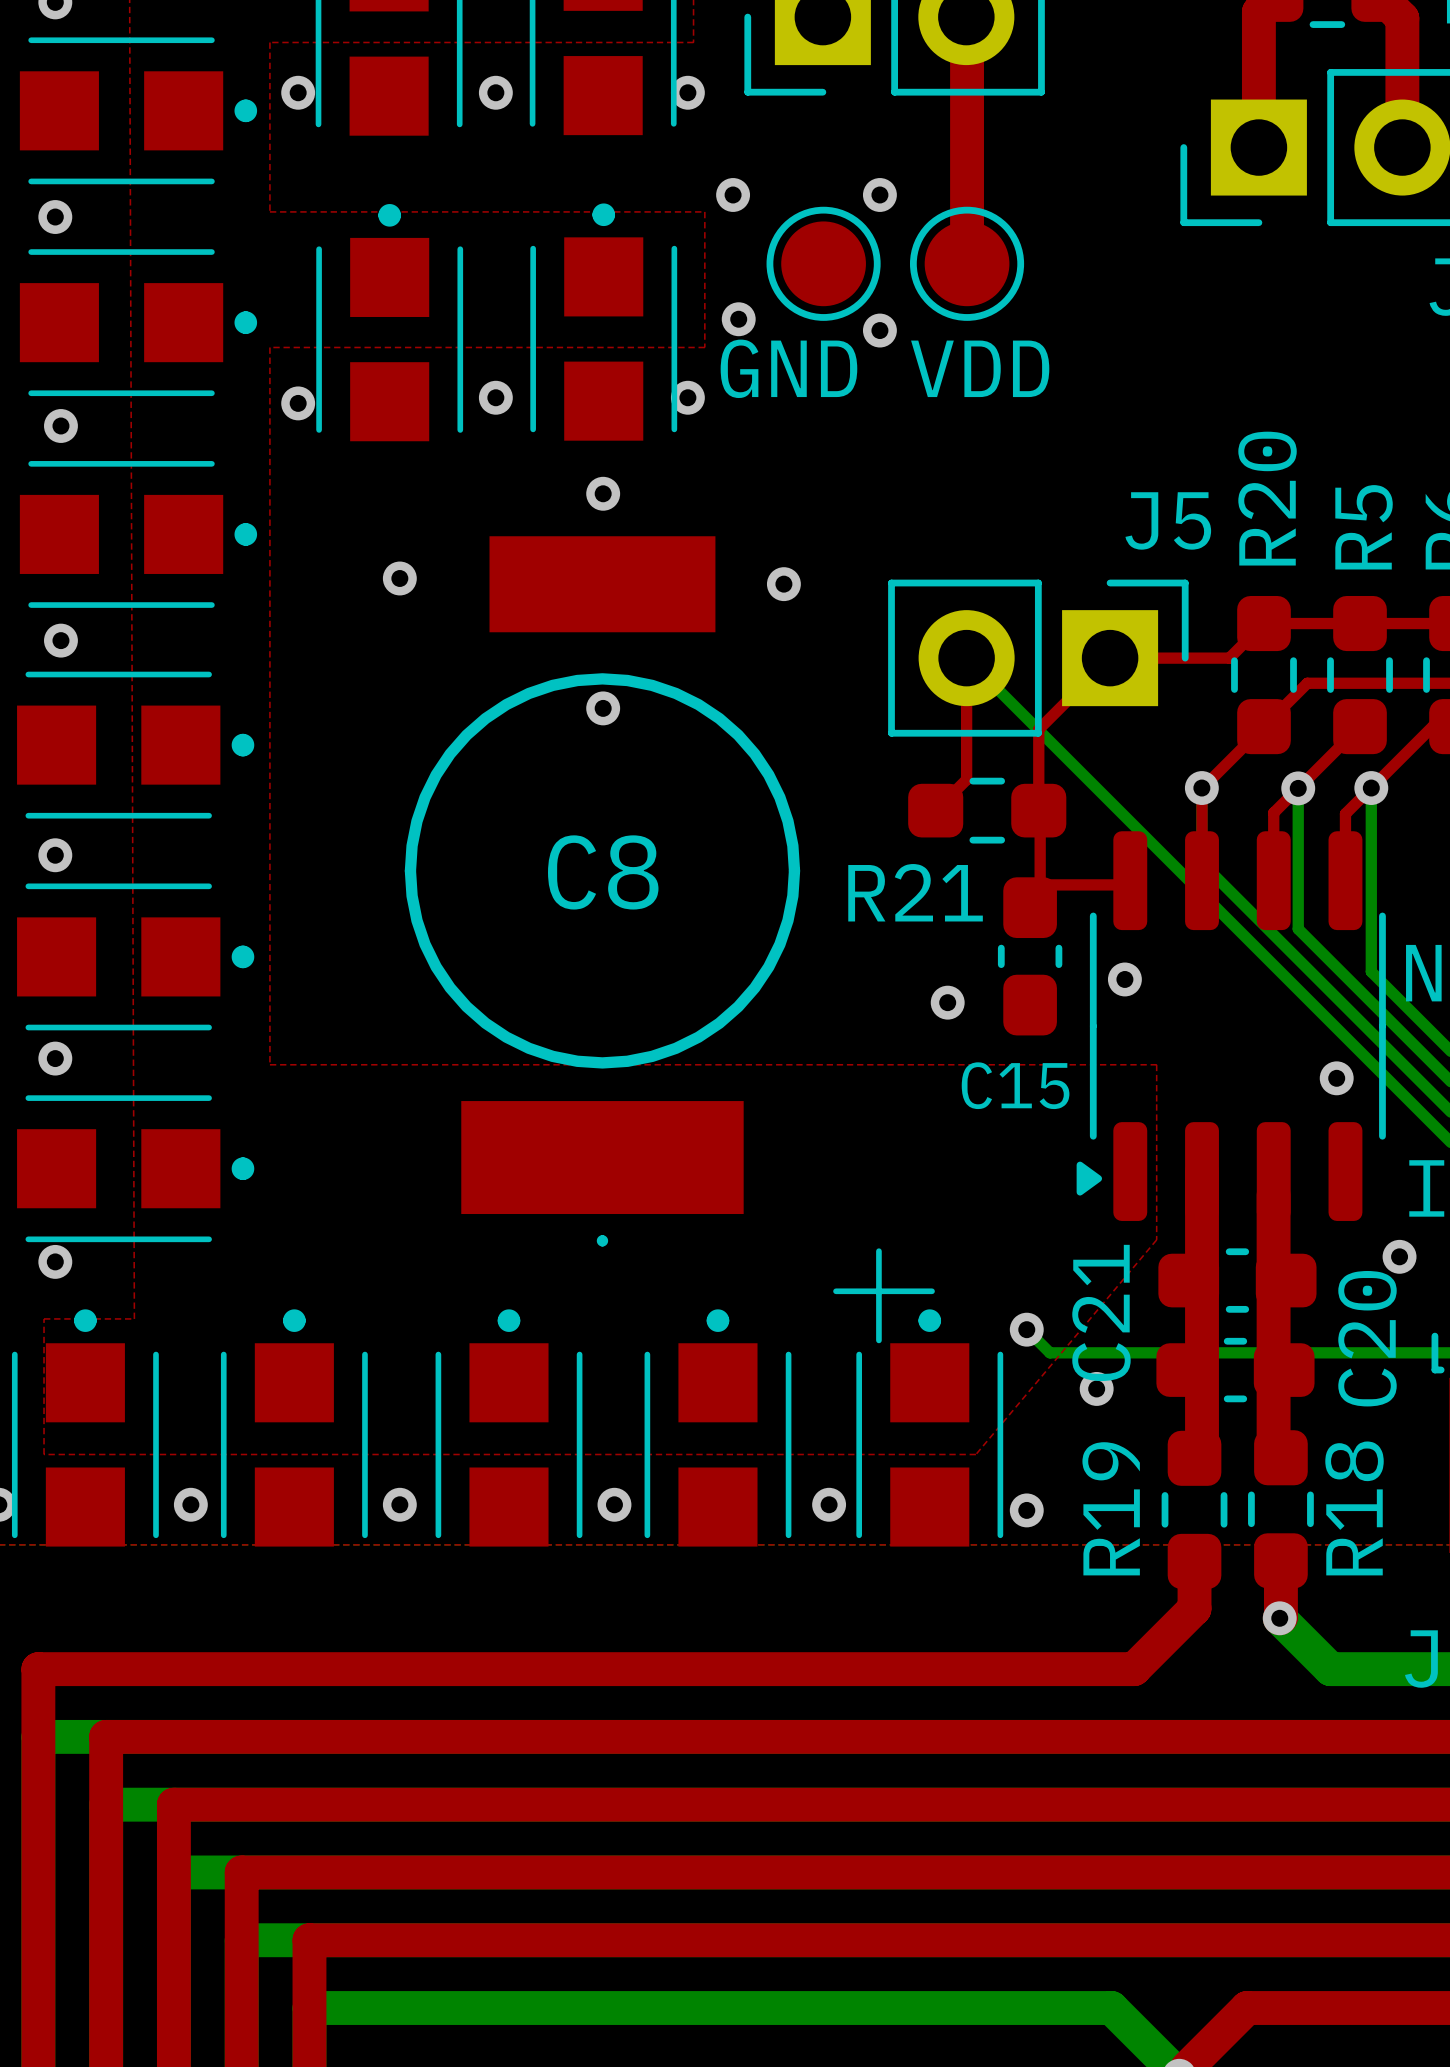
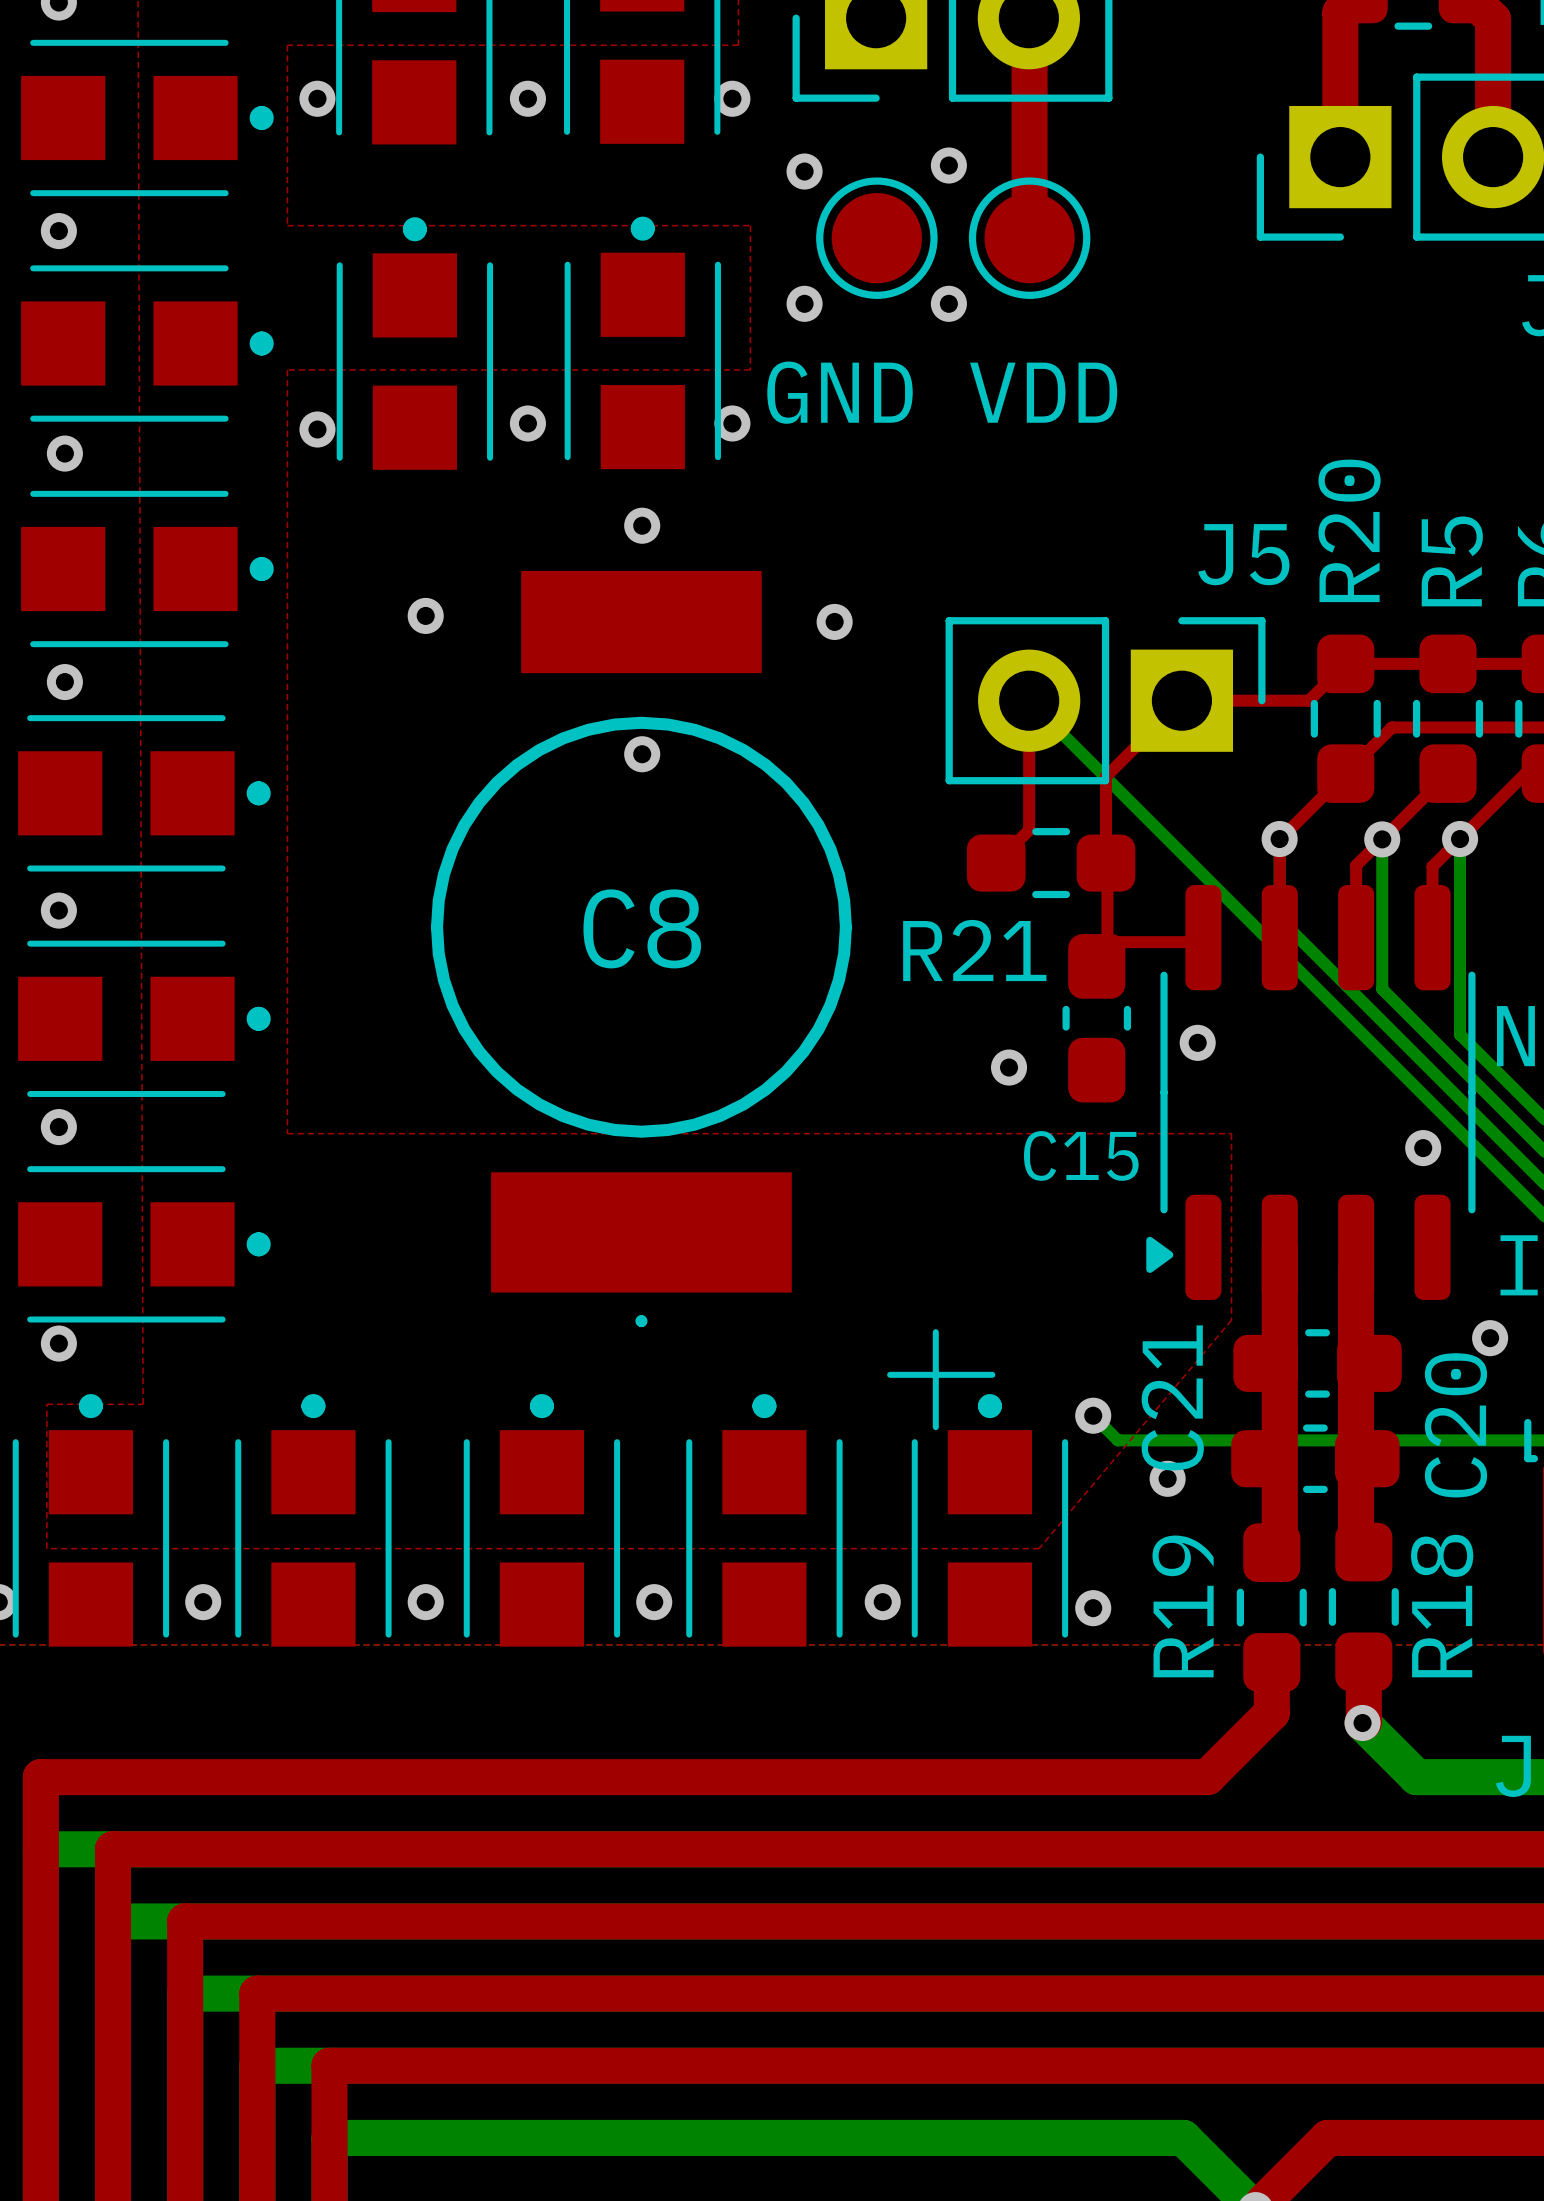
via position: (733, 194) -> (804, 171)
via position: (879, 194) -> (948, 165)
part position: (823, 263) -> (876, 238)
part position: (967, 263) -> (1029, 238)
via: none -> (948, 303)
via position: (738, 319) -> (804, 303)
via: (879, 330) -> none

